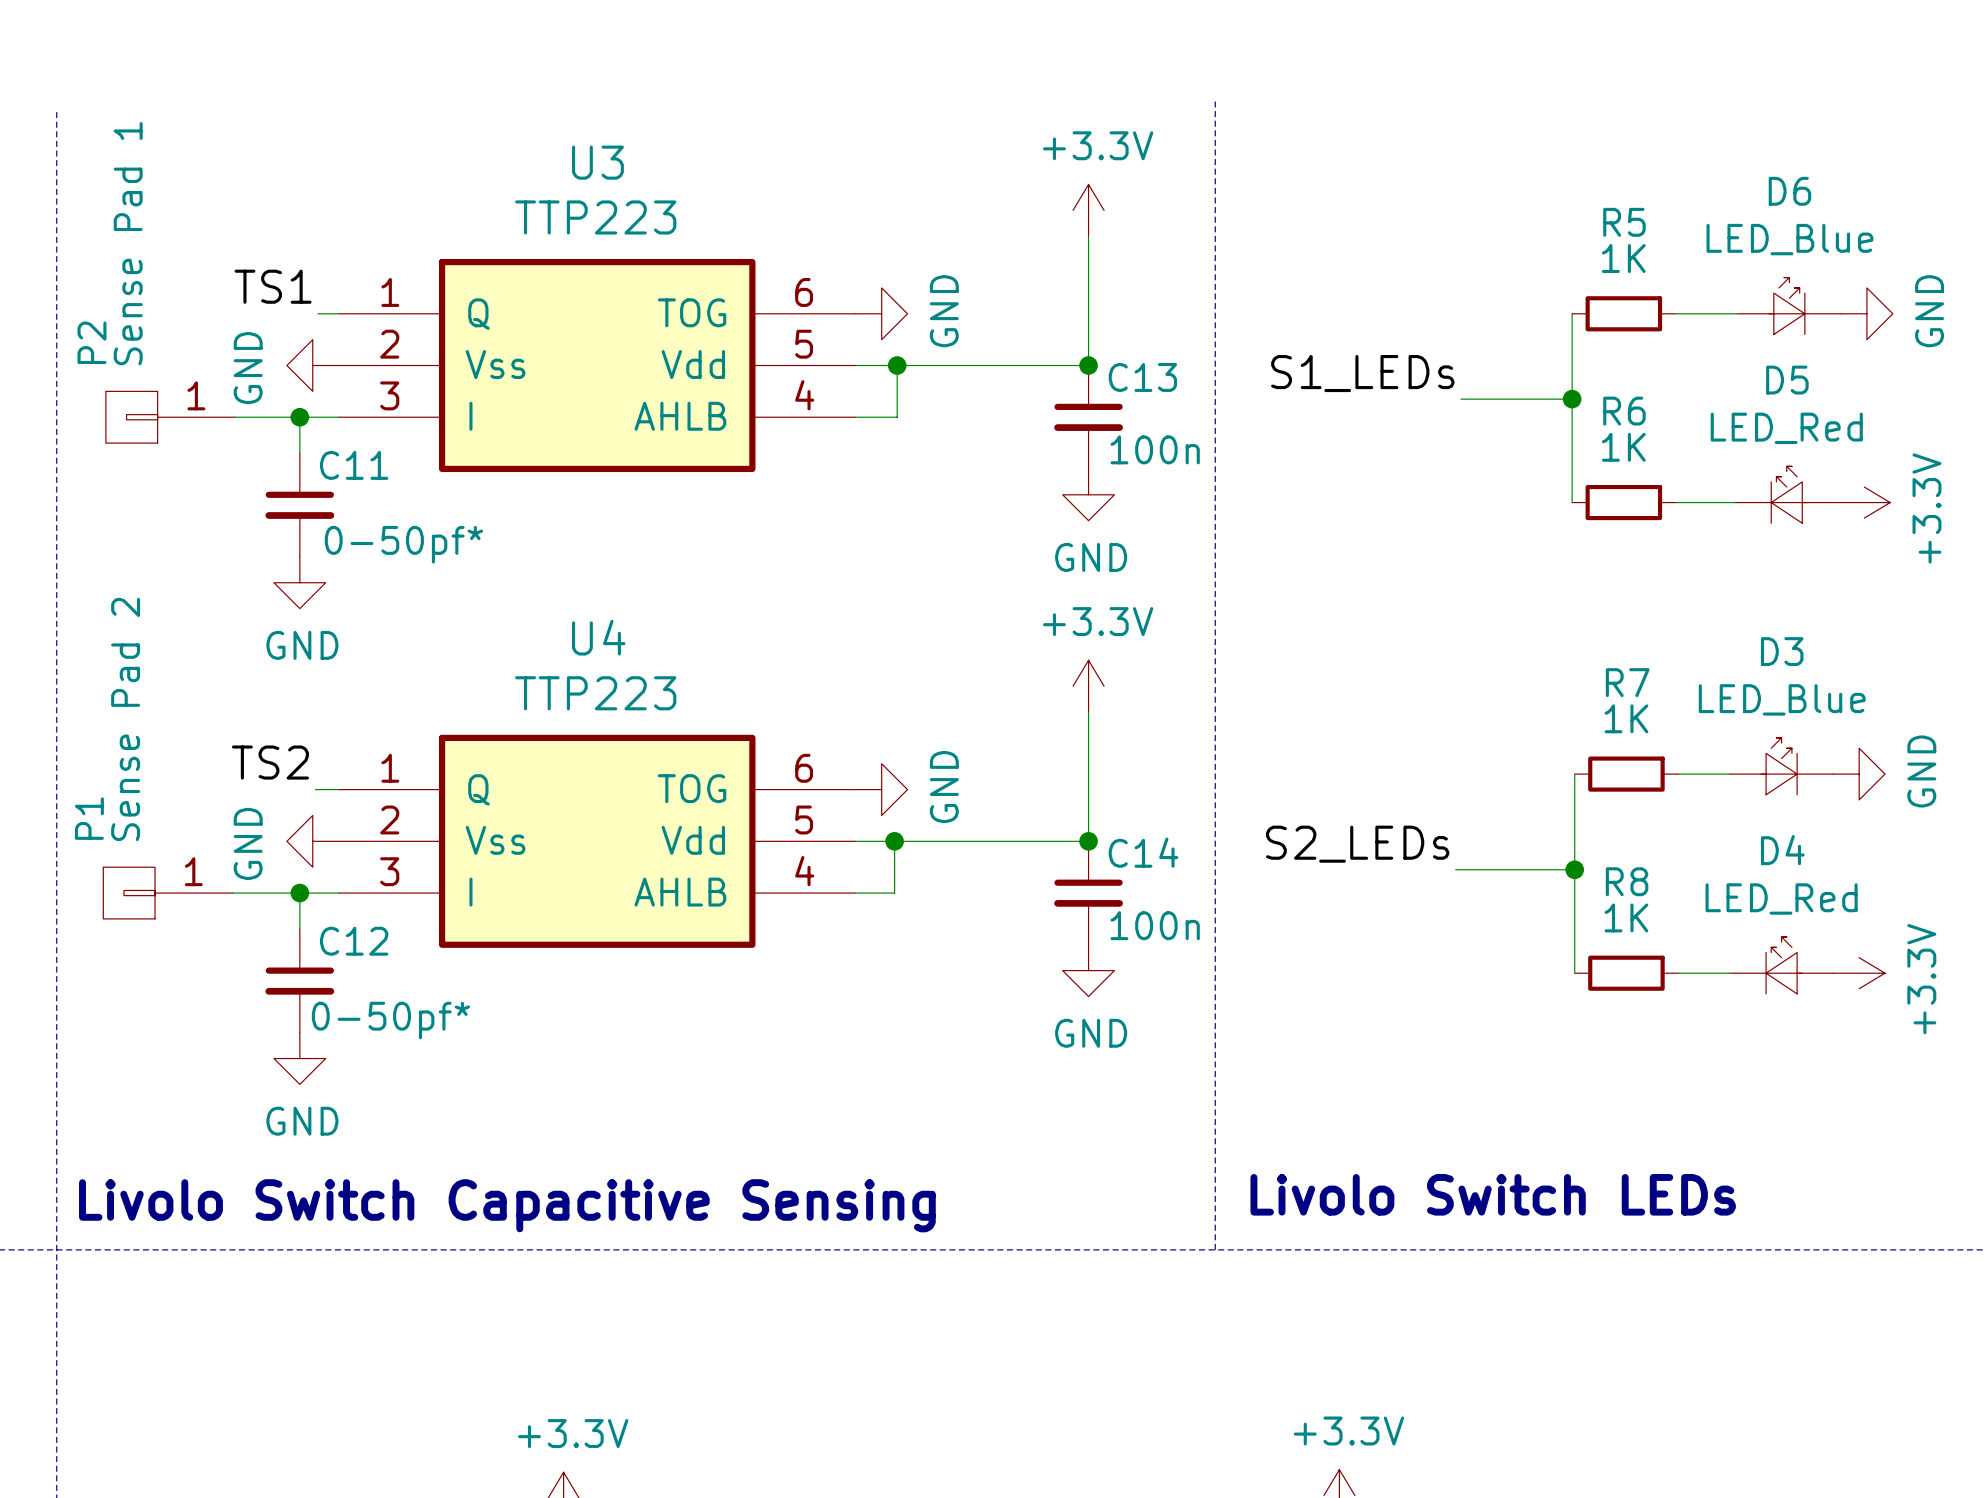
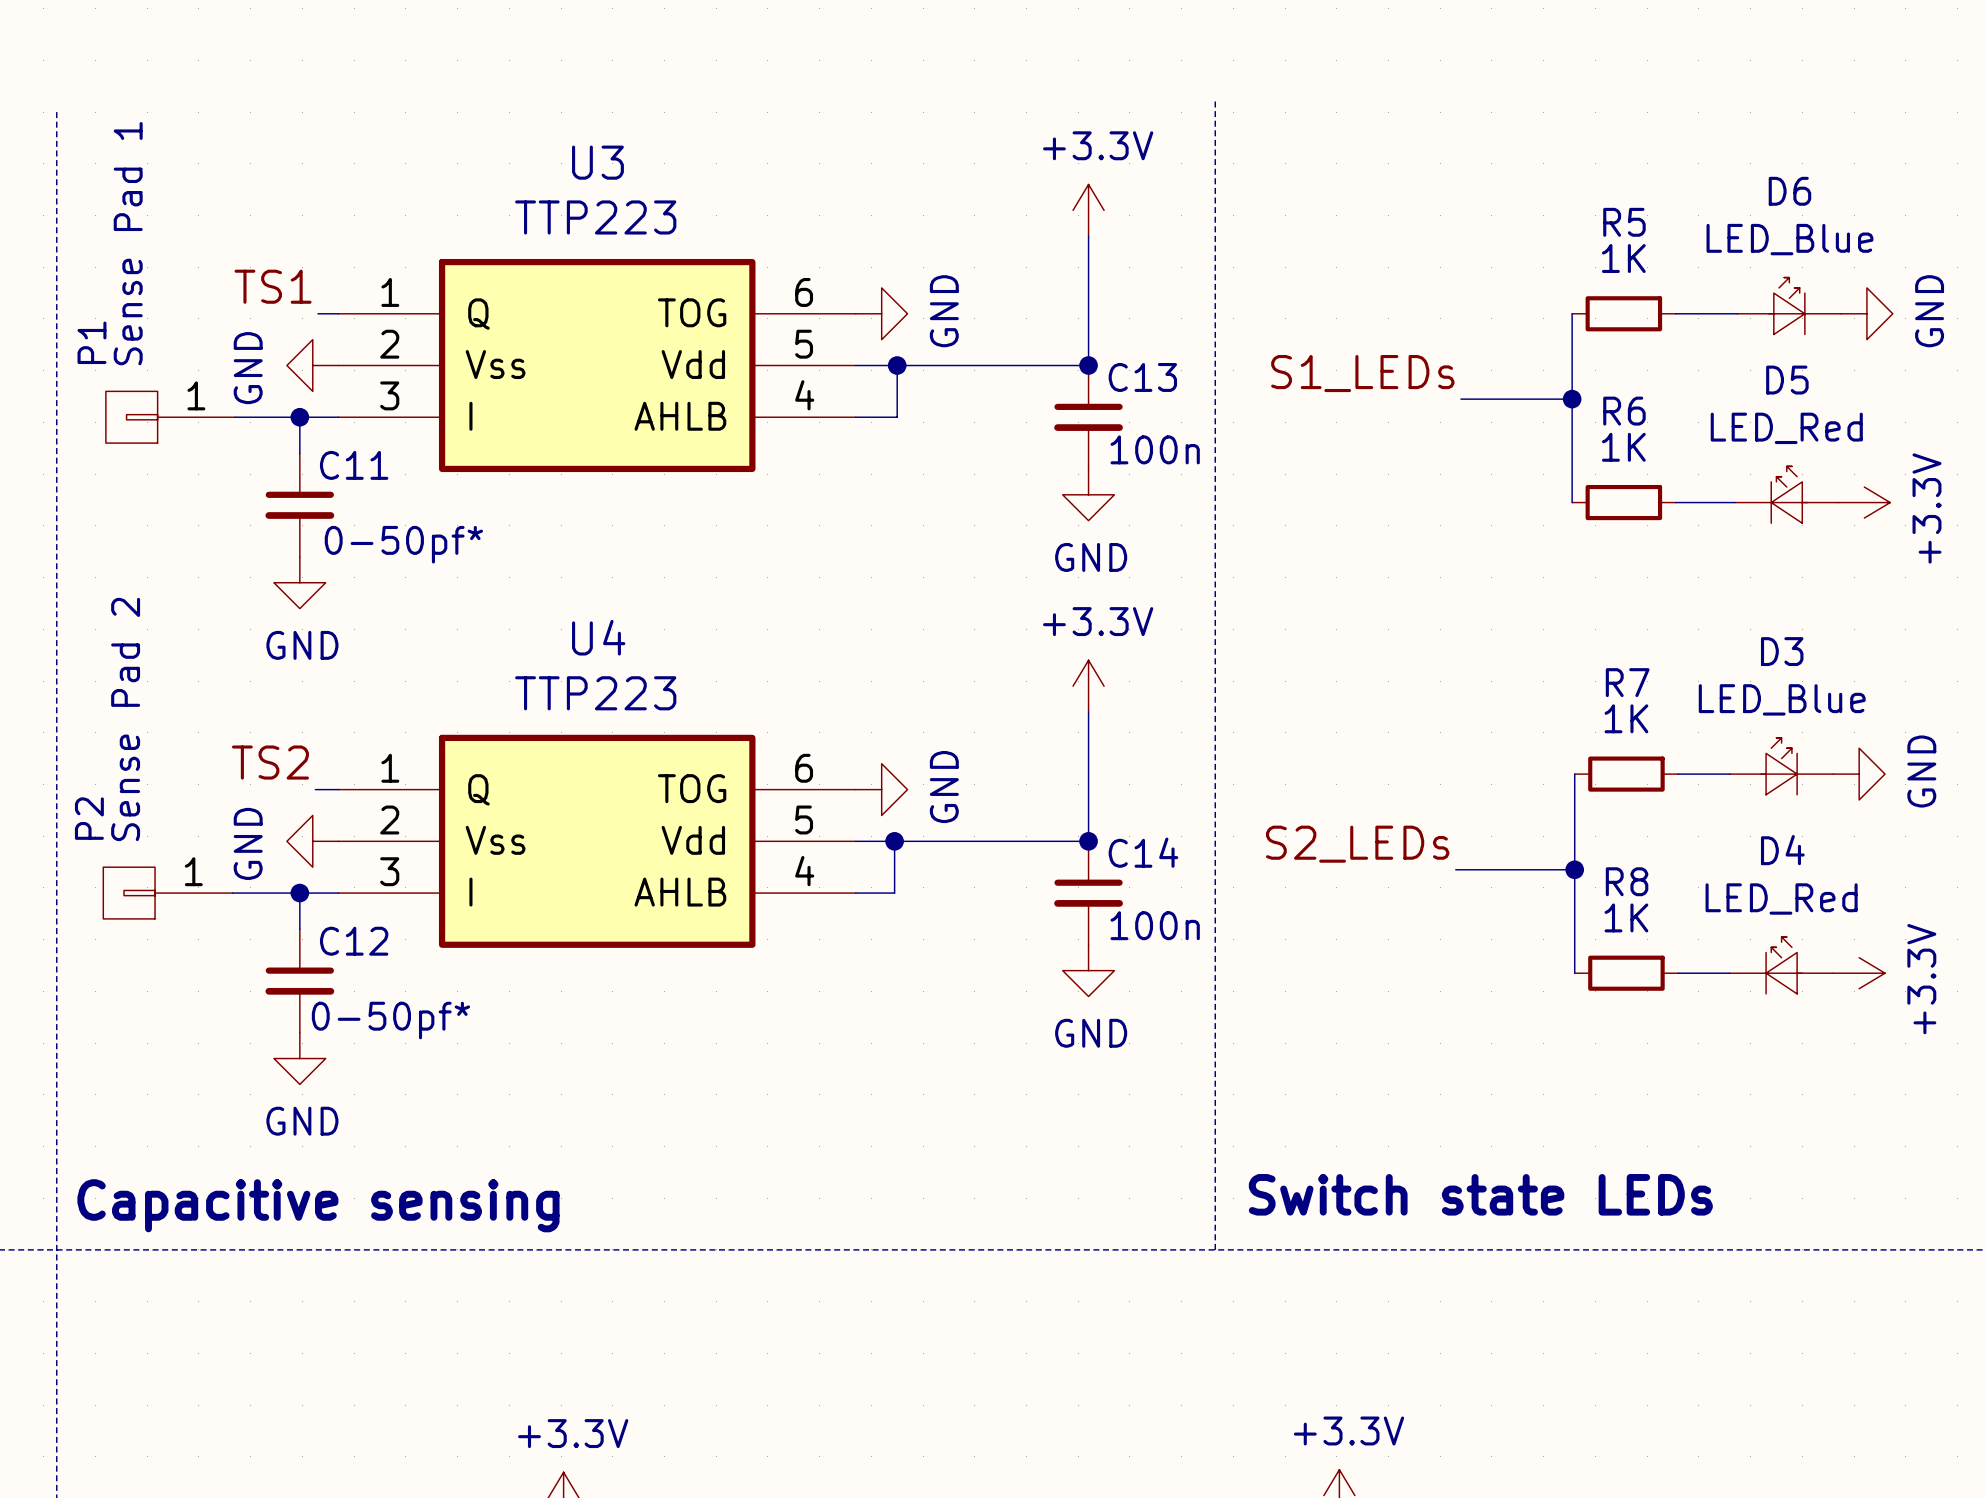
P2 name: P2 (91, 342) -> P1 (91, 342)
P1 name: P1 (89, 818) -> P2 (89, 818)
text: Livolo Switch LEDs (1493, 1194) -> Switch state LEDs (1480, 1194)
text: Livolo Switch Capacitive Sensing (507, 1205) -> Capacitive sensing (318, 1205)

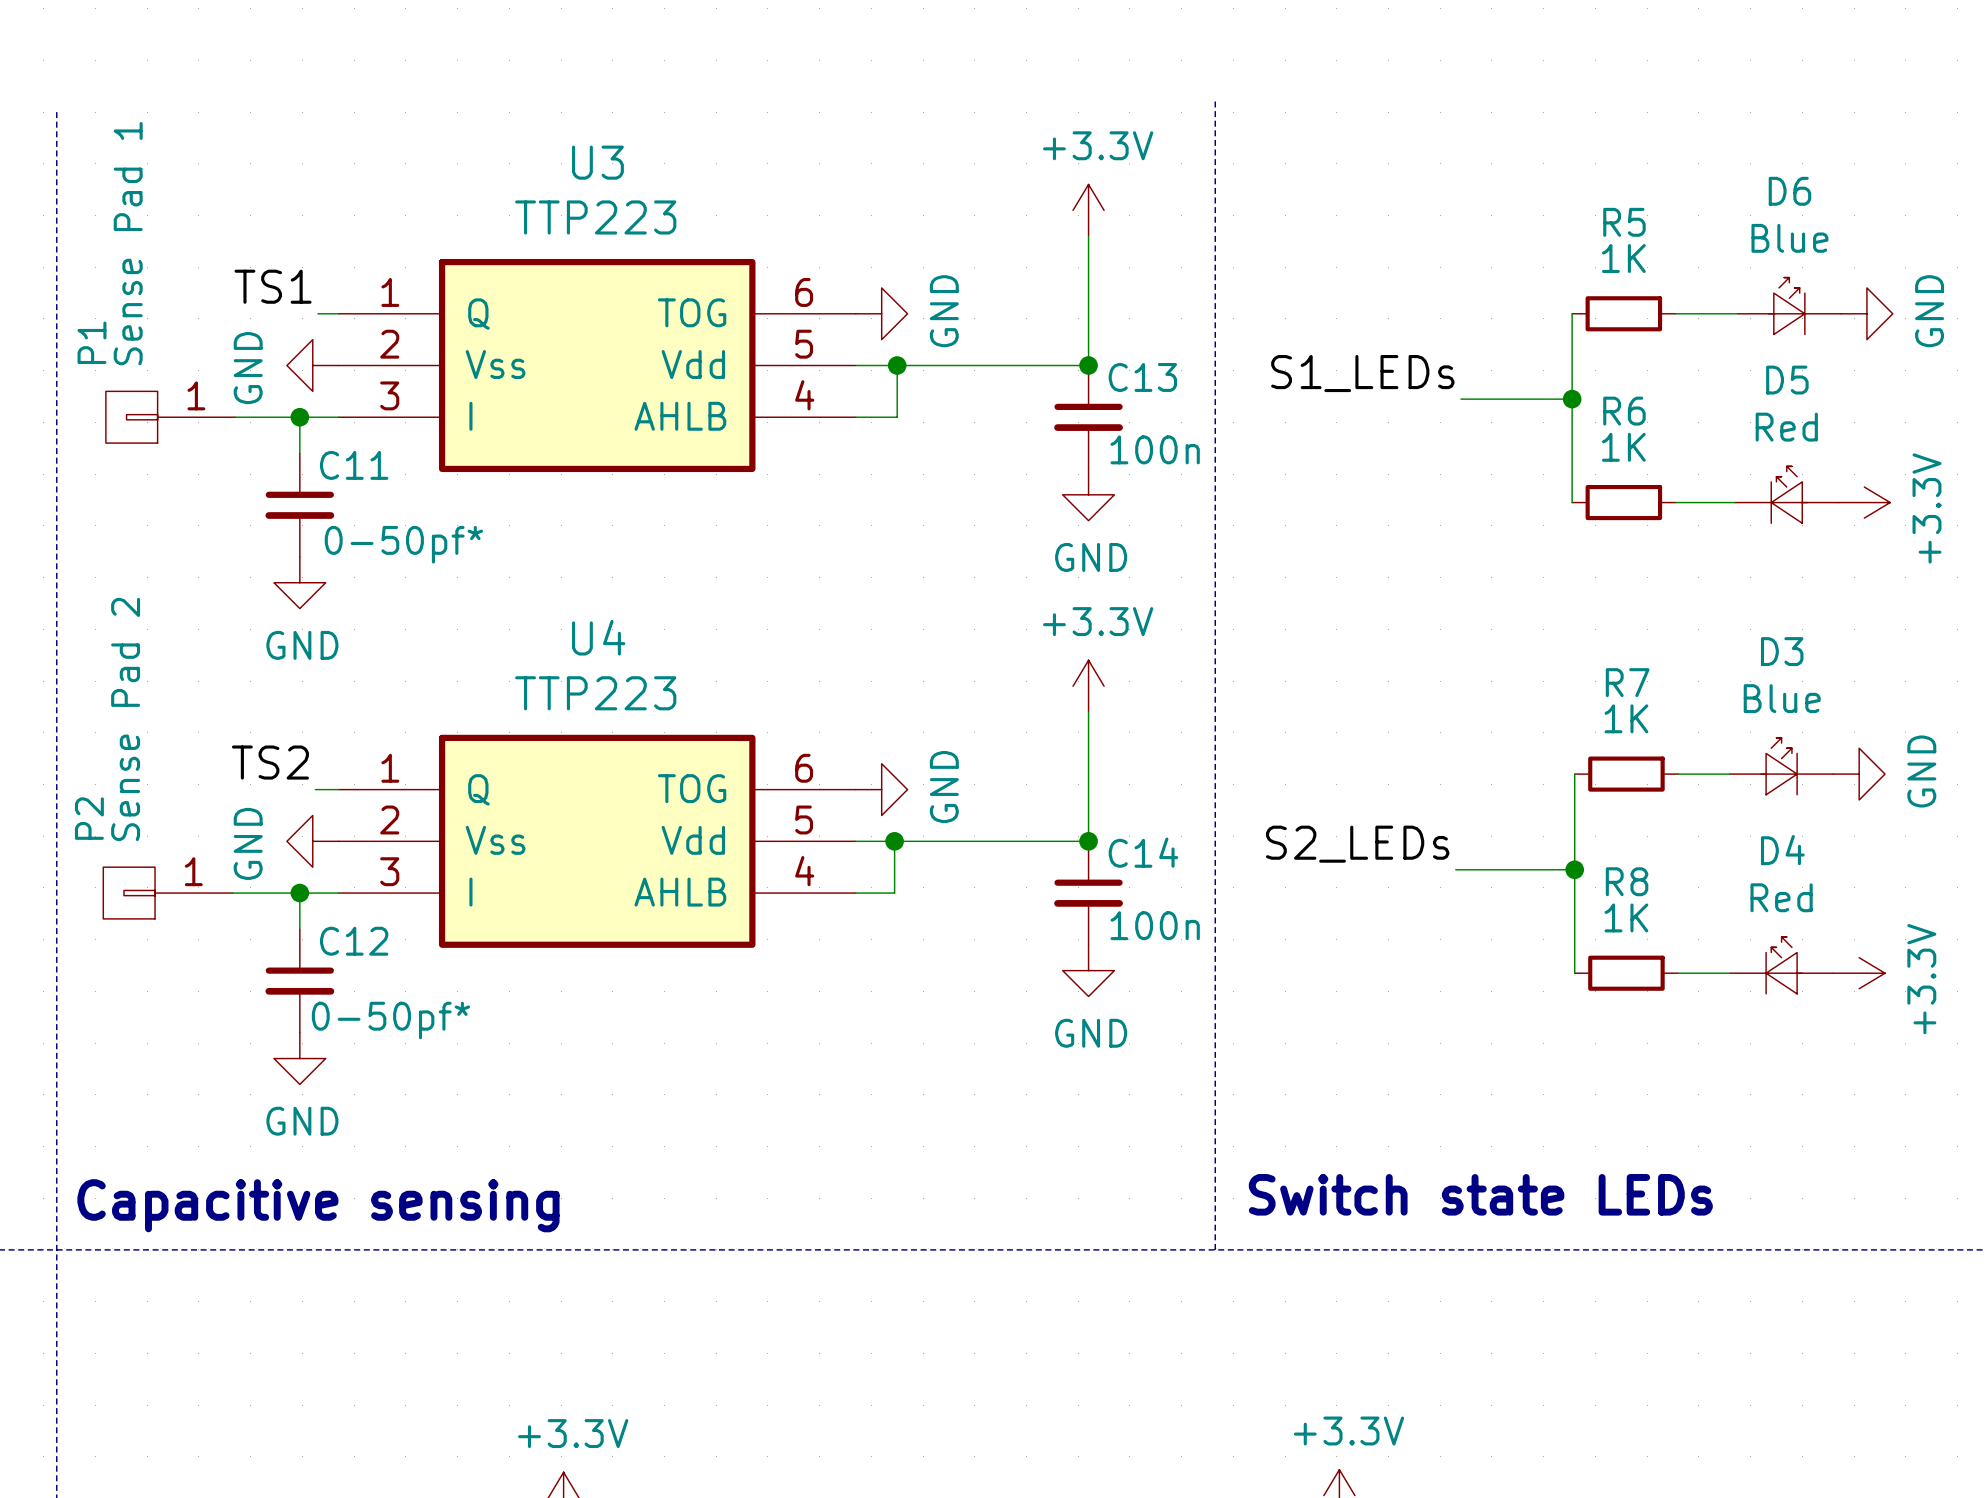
D6 value: LED_Blue (1789, 239) -> Blue (1789, 238)
D5 value: LED_Red (1786, 428) -> Red (1786, 427)
D3 value: LED_Blue (1782, 699) -> Blue (1782, 698)
D4 value: LED_Red (1781, 899) -> Red (1781, 897)

